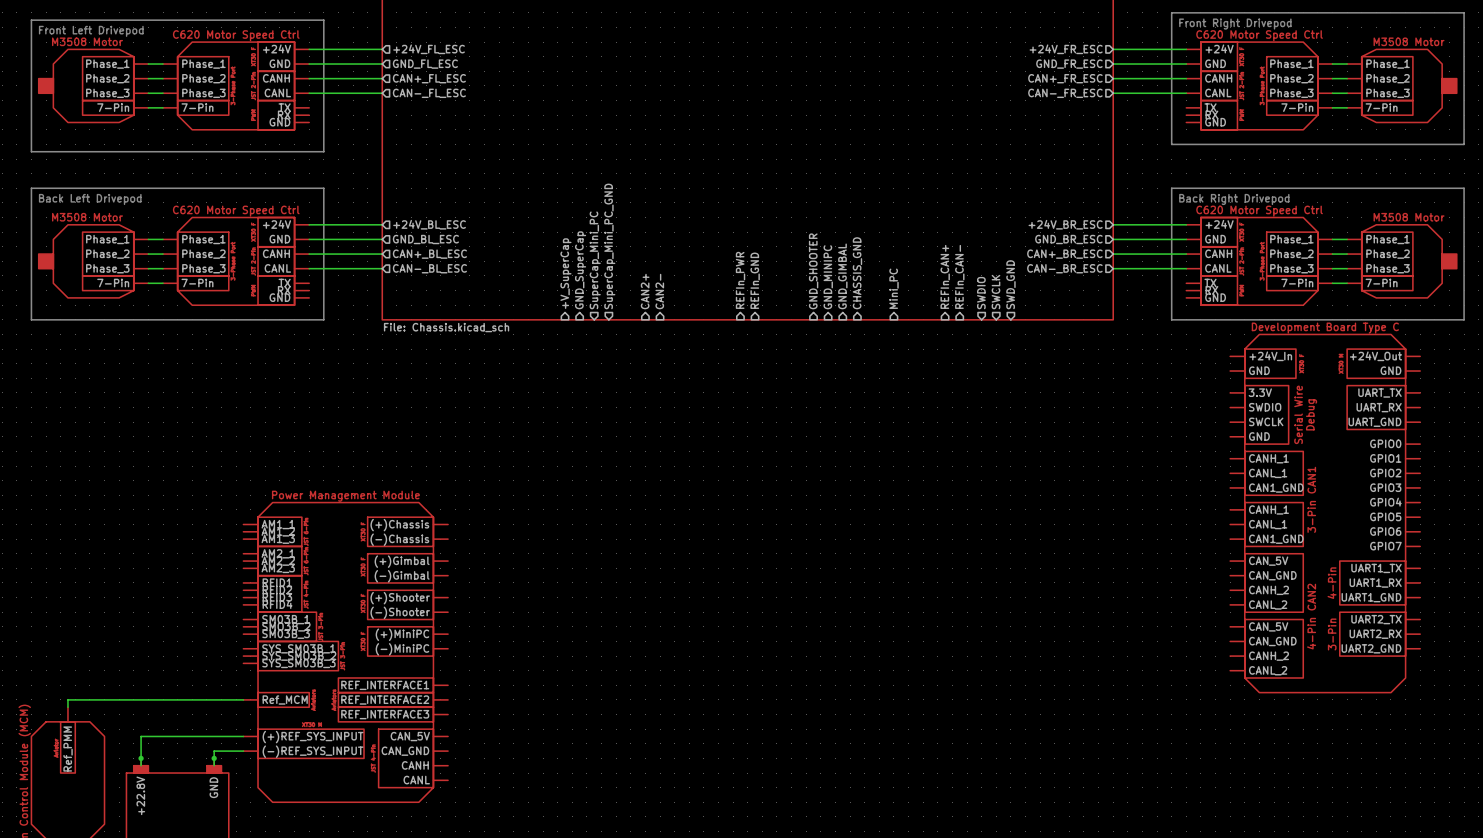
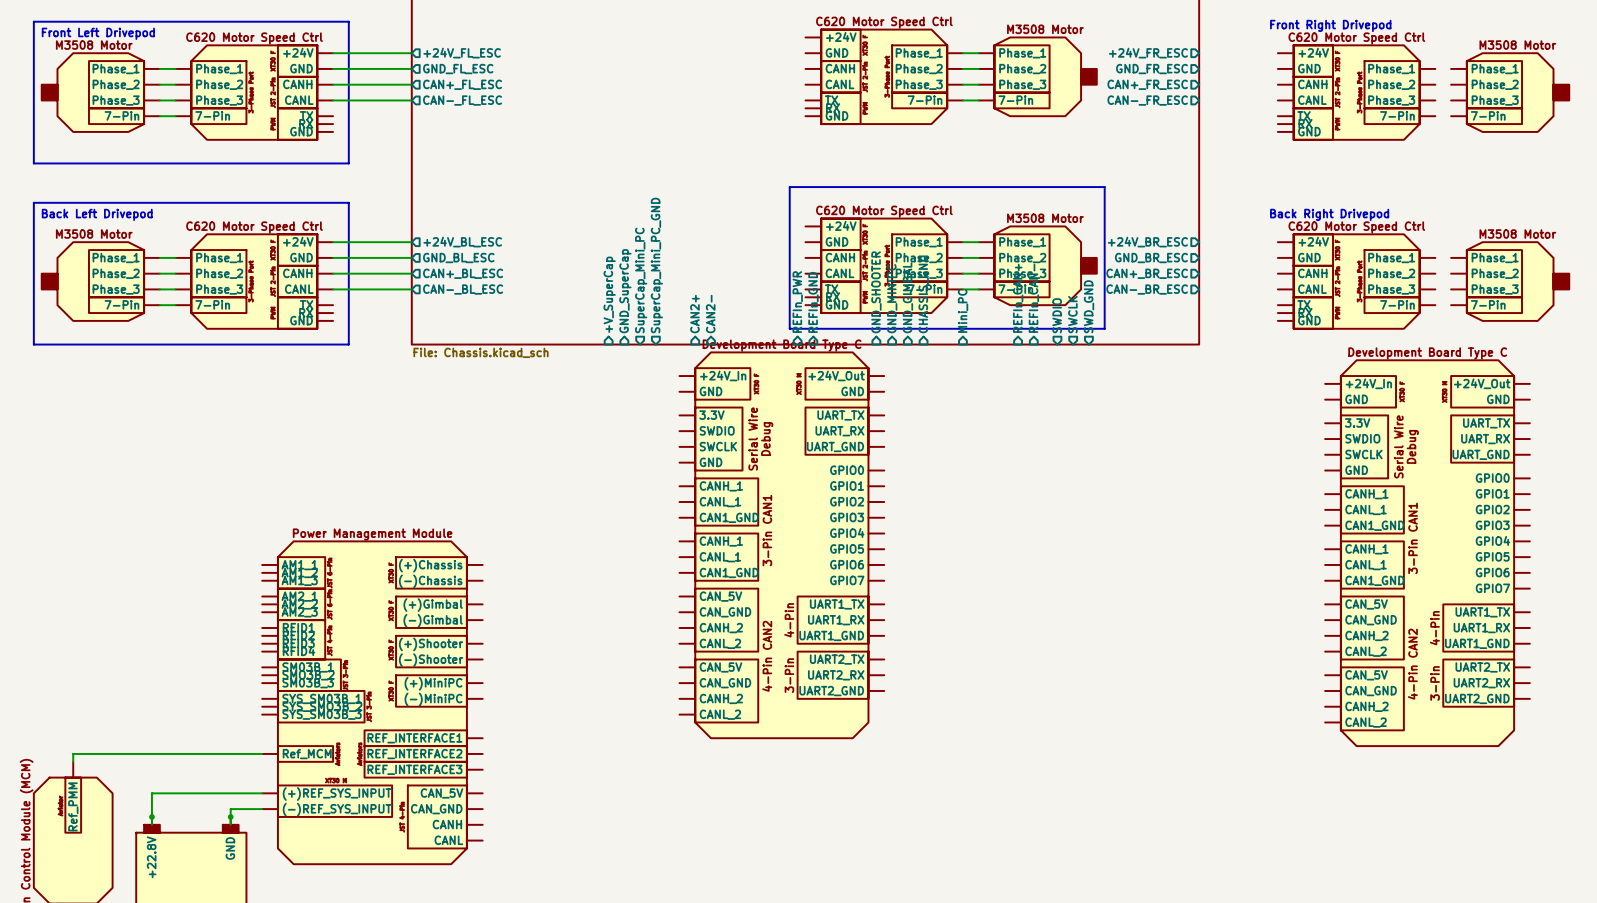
line: (1171, 12) (1171, 144) (1464, 144) (1464, 12) (1171, 12) -> none
wire: none -> (962, 53) (978, 53)
wire: (1113, 49) (1186, 49) -> none
wire: none -> (962, 68) (978, 68)
wire: (1113, 64) (1186, 64) -> none
wire: (1332, 64) (1347, 64) -> none
part: none -> (884, 76)
part: none -> (1037, 76)
wire: none -> (962, 84) (978, 84)
wire: (1113, 78) (1186, 78) -> none
wire: (1332, 78) (1347, 78) -> none
wire: none -> (962, 100) (978, 100)
wire: (1113, 93) (1186, 93) -> none
wire: (1332, 93) (1347, 93) -> none
wire: (1332, 107) (1347, 107) -> none
line: none -> (789, 187) (1104, 187) (1104, 328) (789, 328) (789, 187)
line: (1171, 188) (1464, 188) (1464, 319) (1171, 319) (1171, 188) -> none
wire: none -> (962, 242) (978, 242)
wire: (1113, 224) (1186, 224) -> none
wire: none -> (962, 257) (978, 257)
wire: (1113, 239) (1186, 239) -> none
wire: (1332, 239) (1347, 239) -> none
part: none -> (884, 265)
part: none -> (1037, 265)
wire: none -> (962, 273) (978, 273)
wire: (1113, 254) (1186, 254) -> none
wire: (1332, 254) (1347, 254) -> none
wire: none -> (962, 289) (978, 289)
wire: (1113, 268) (1186, 268) -> none
wire: (1332, 268) (1347, 268) -> none
wire: (1332, 283) (1347, 283) -> none
part: none -> (781, 545)

